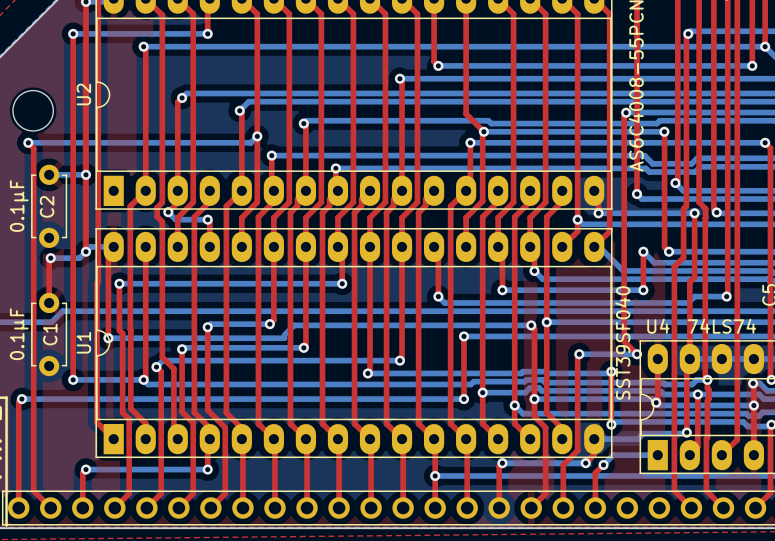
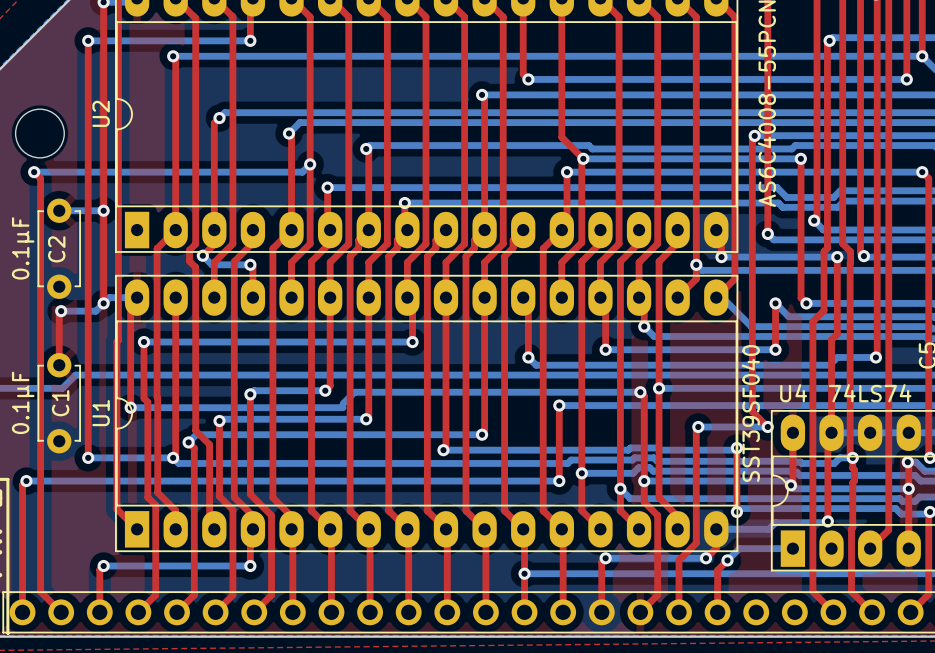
top track: (697, 394) (697, 447) (689, 455) -> none
via: (697, 394) -> none

